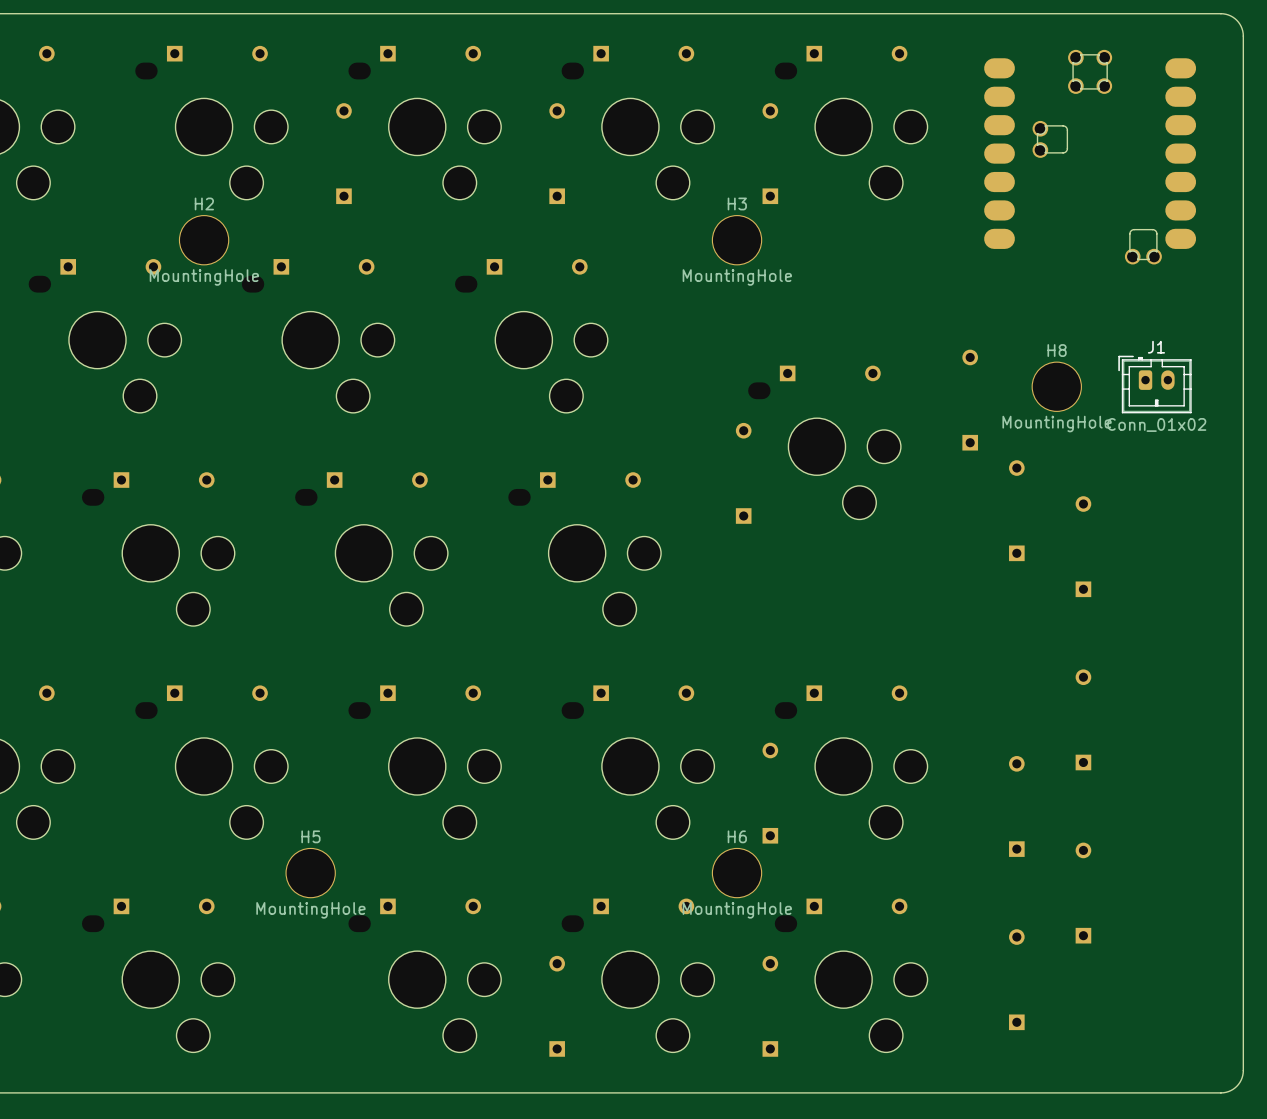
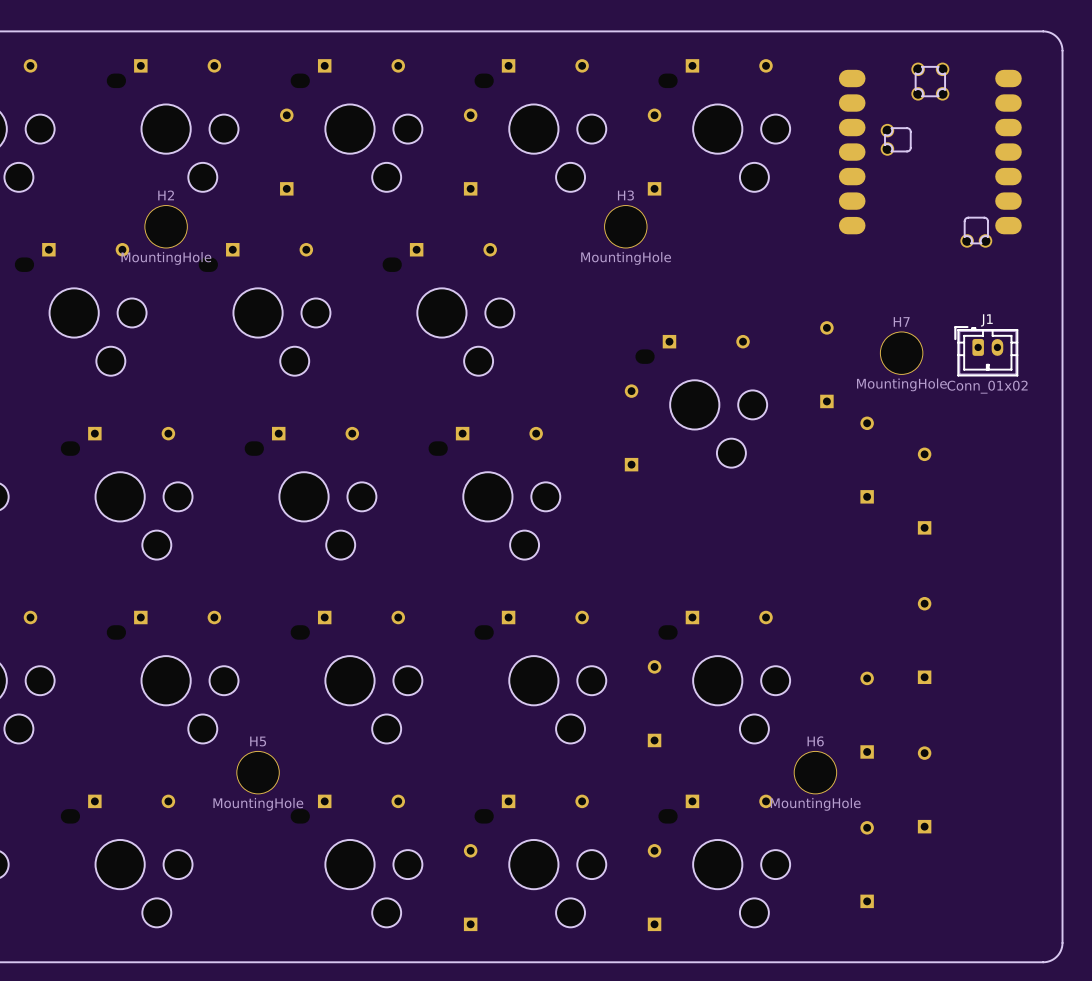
H8 name: H8 (1057, 350) -> H7 (901, 321)
H6 position: (737, 873) -> (815, 772)

